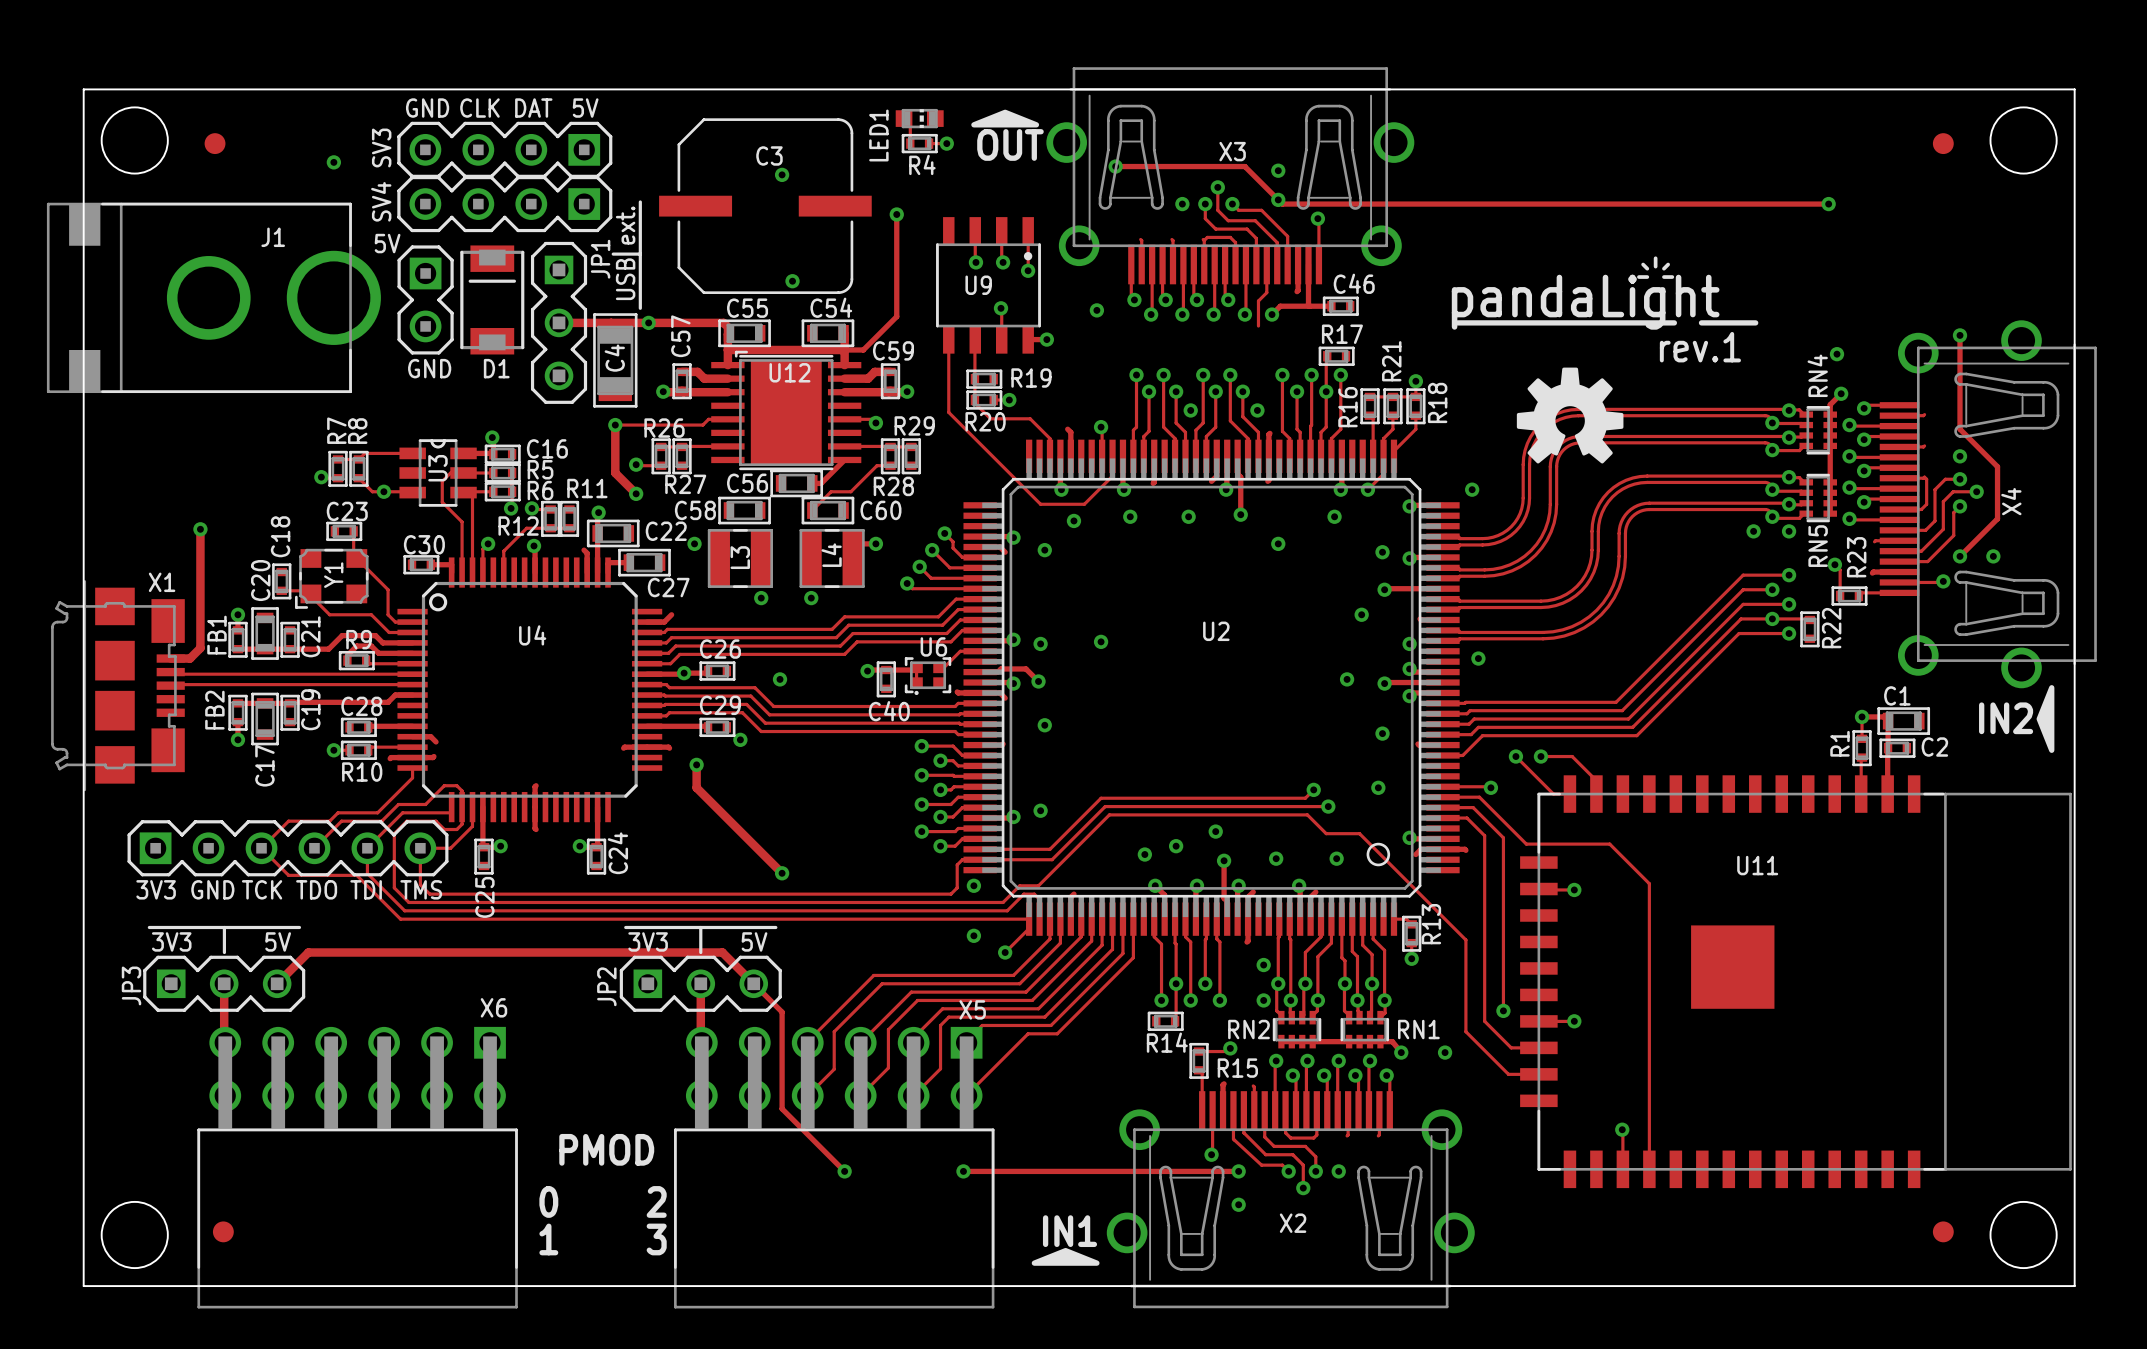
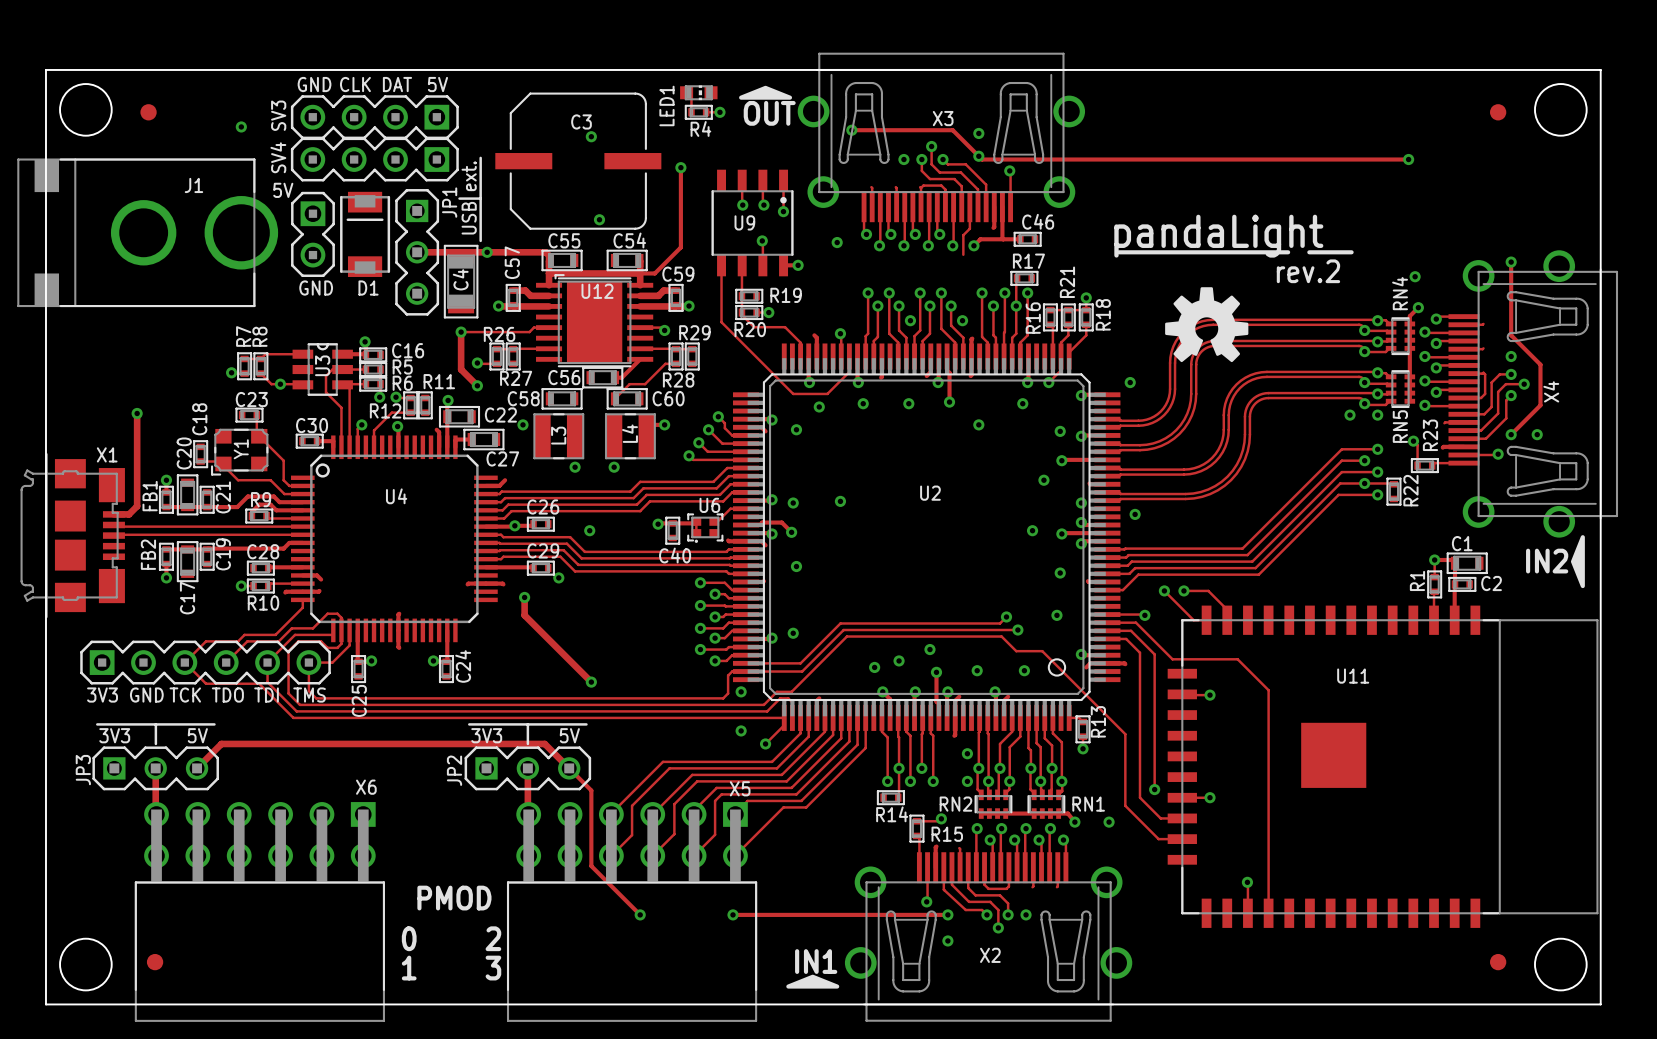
line: (1655, 258) (1655, 266) -> none
line: (1643, 264) (1647, 268) -> none
line: (1668, 264) (1663, 268) -> none
line: (1638, 277) (1647, 277) -> none
line: (1663, 277) (1672, 277) -> none
text: rev.1 (1700, 347) -> rev.2 (1308, 271)

